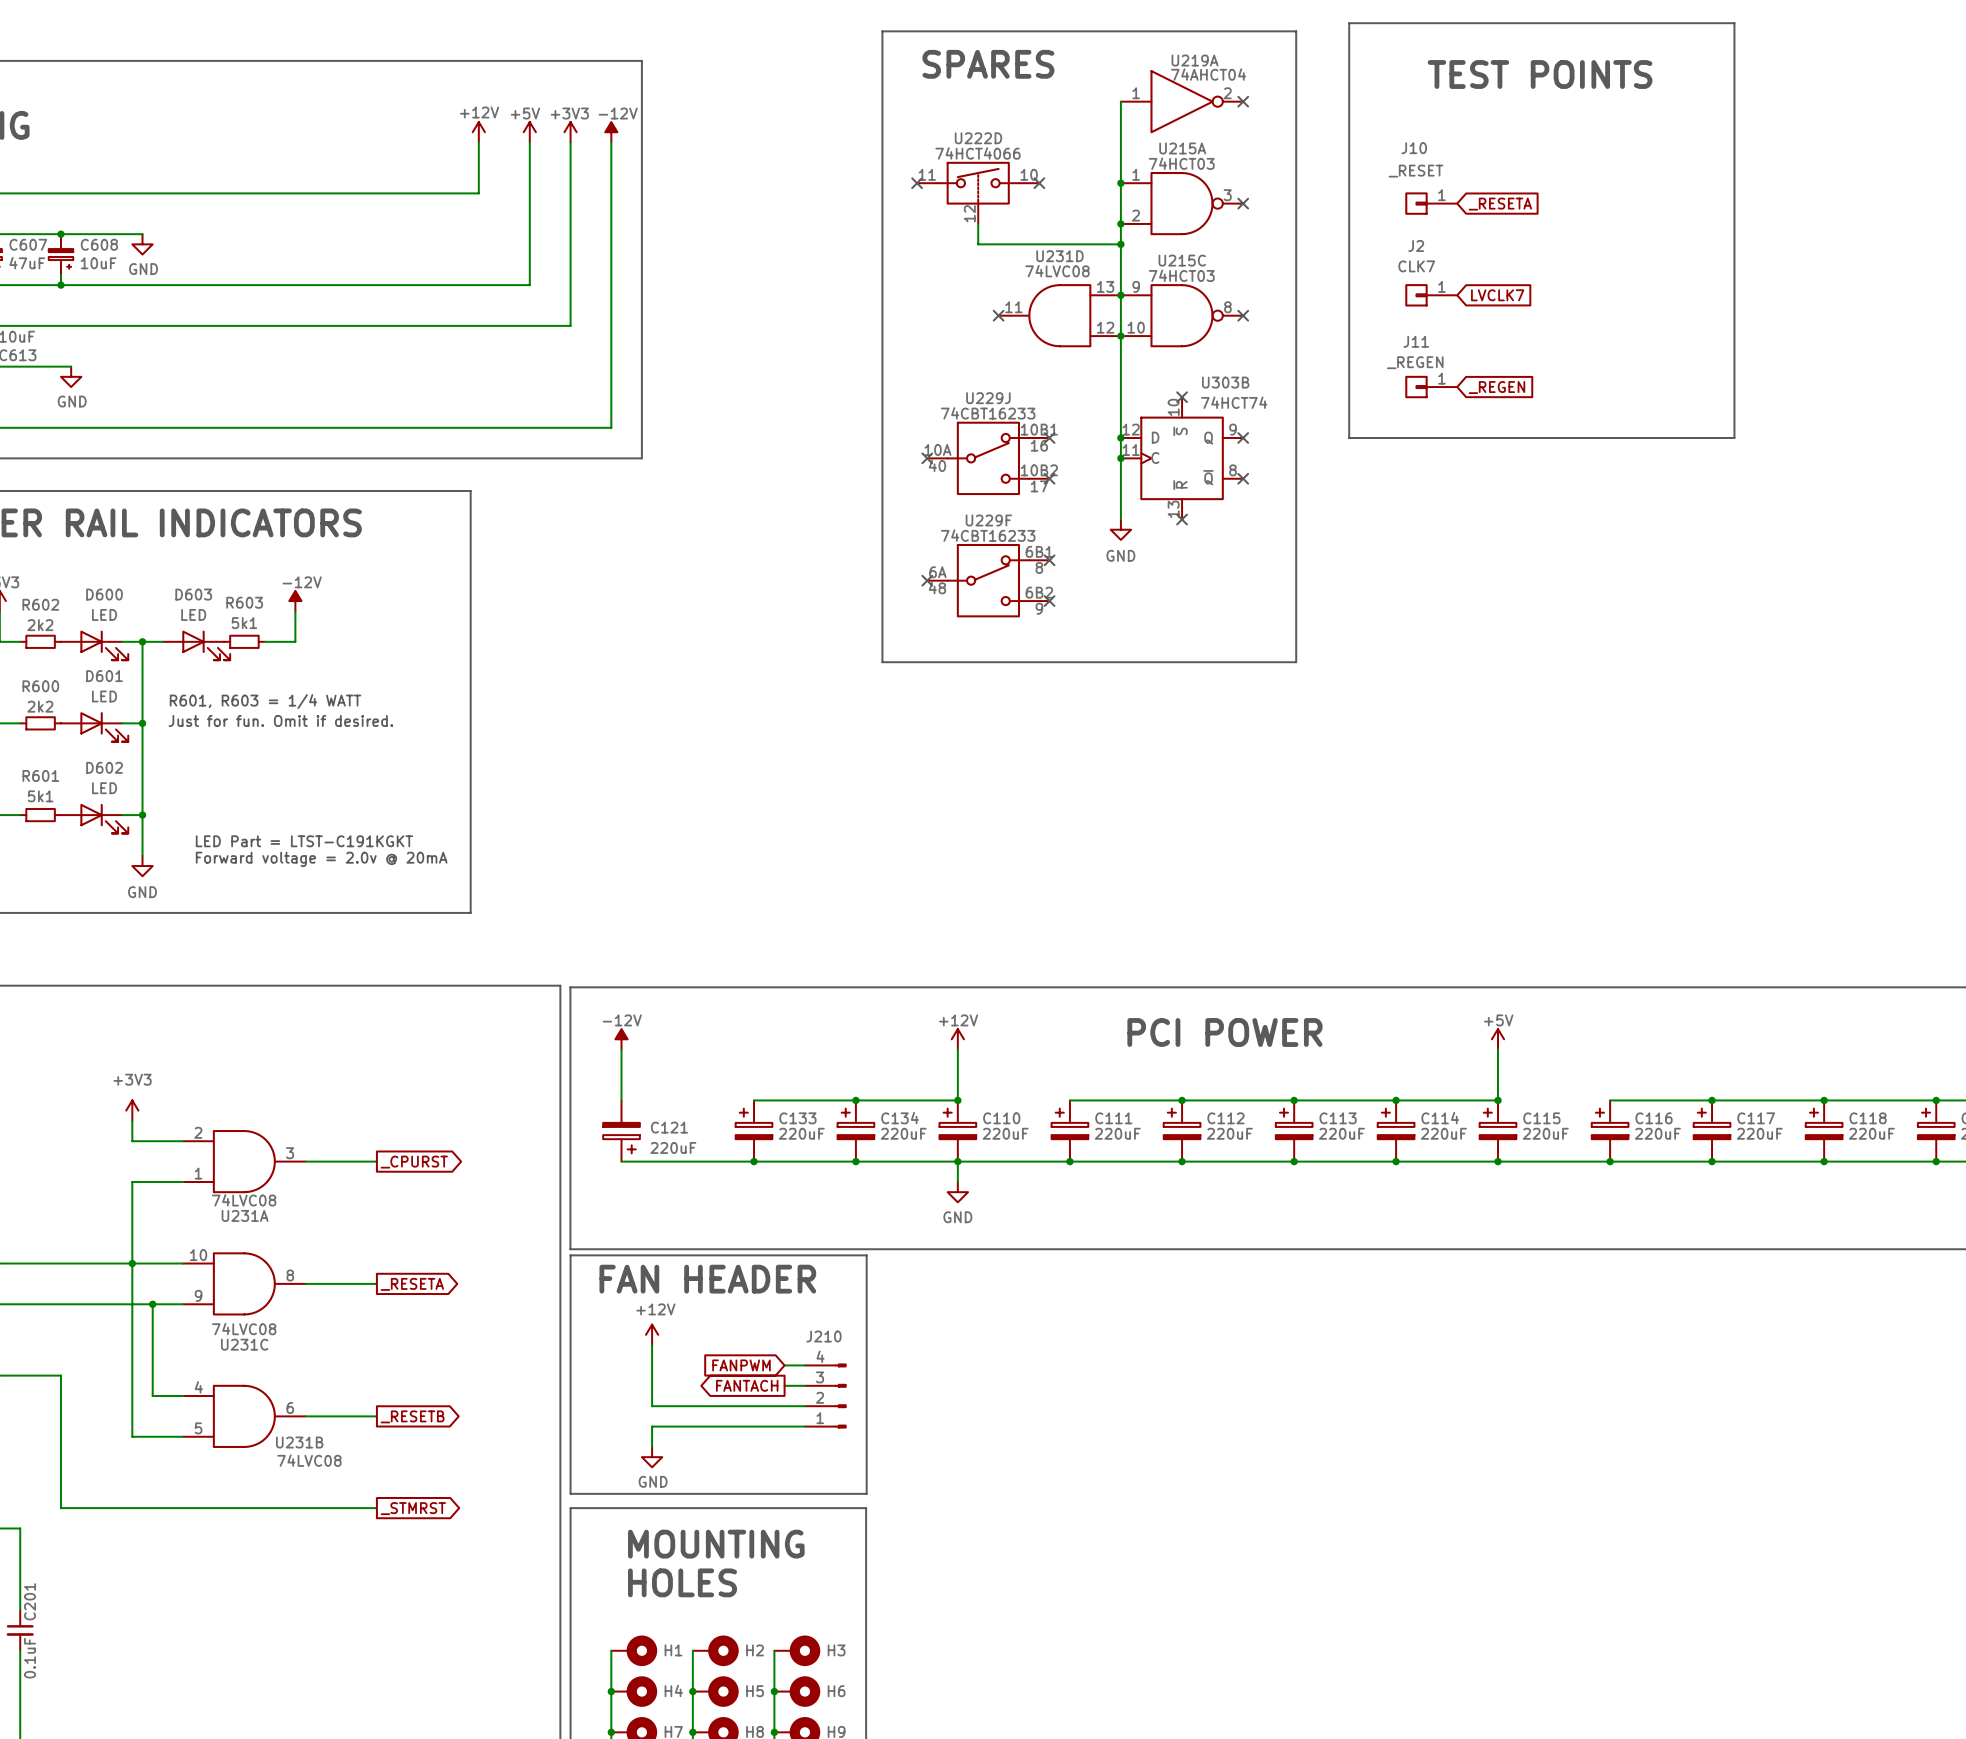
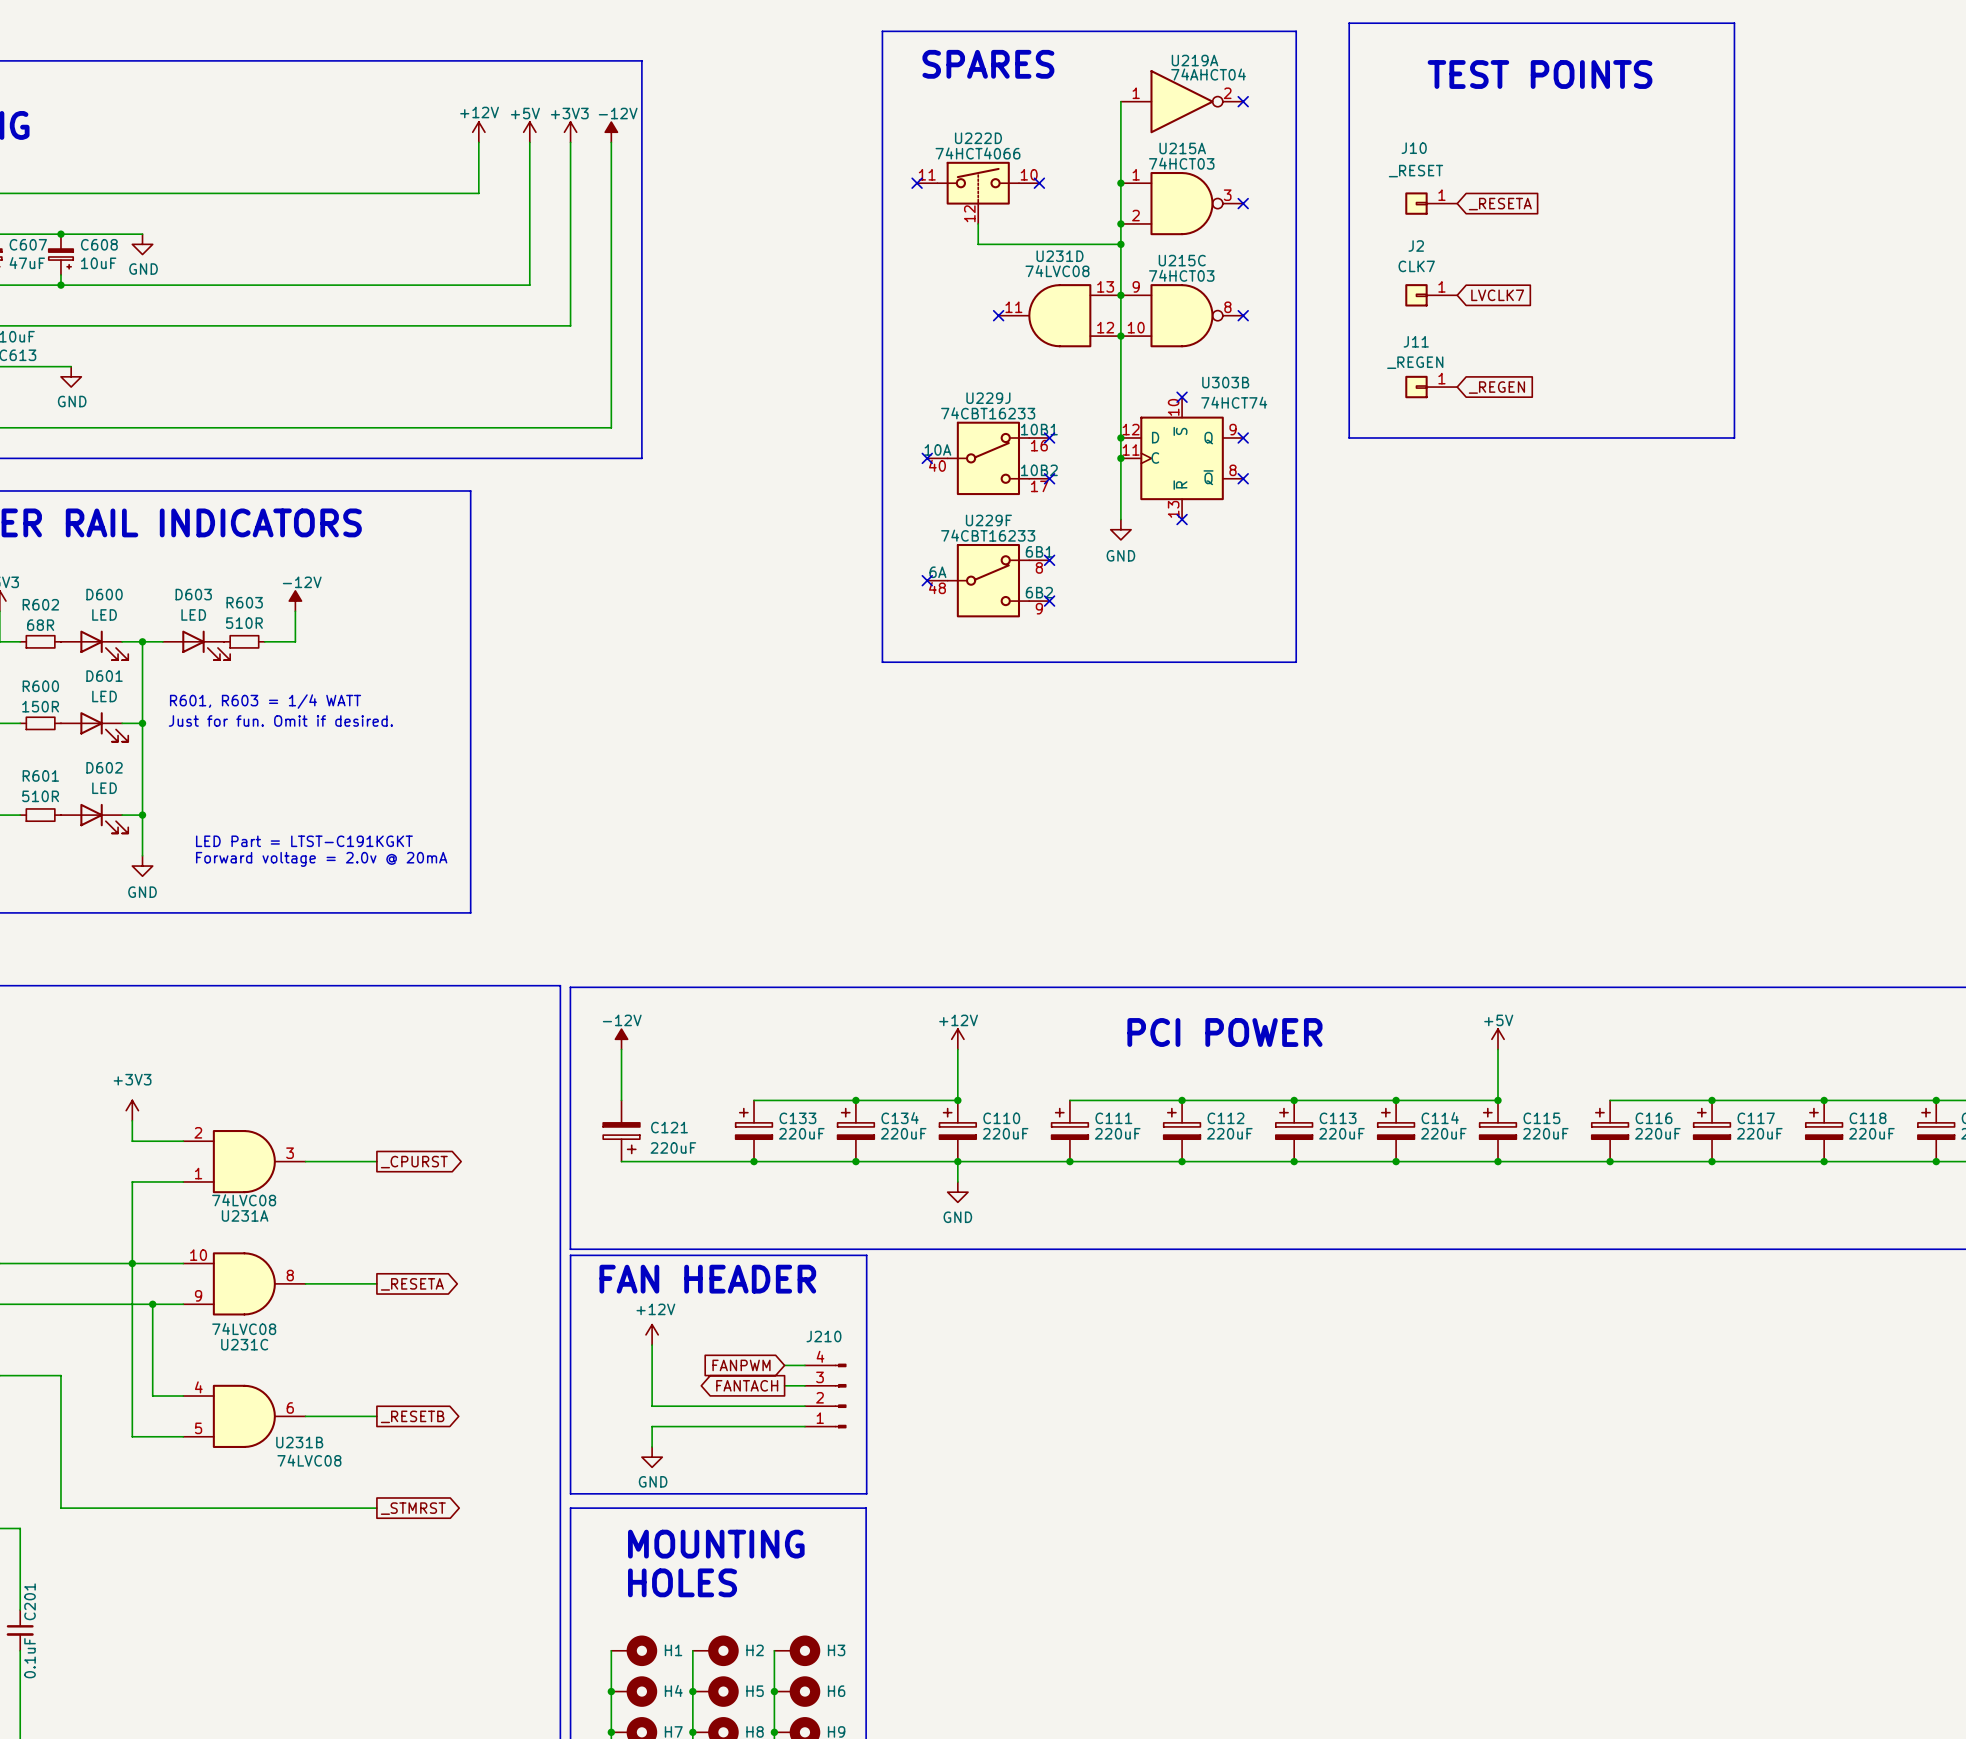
R603 value: 5k1 (244, 623) -> 510R (244, 623)
R602 value: 2k2 (40, 625) -> 68R (40, 625)
R600 value: 2k2 (40, 706) -> 150R (40, 706)
R601 value: 5k1 (40, 796) -> 510R (40, 796)

